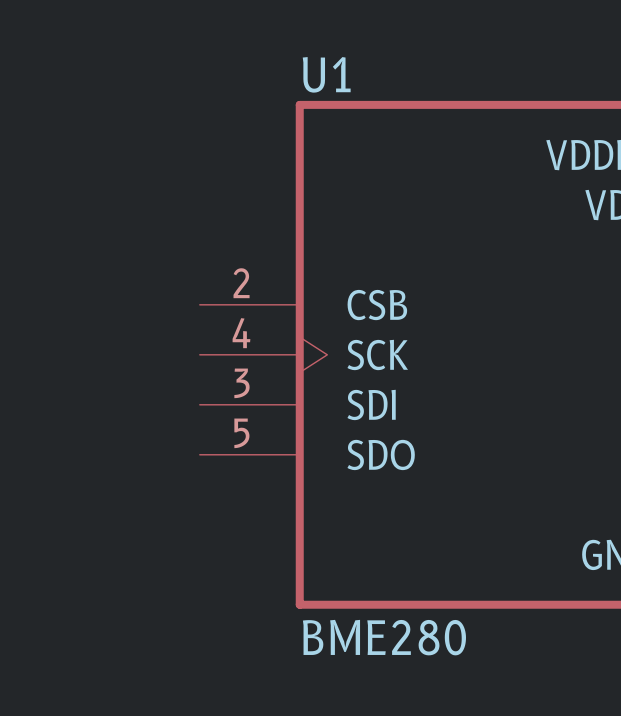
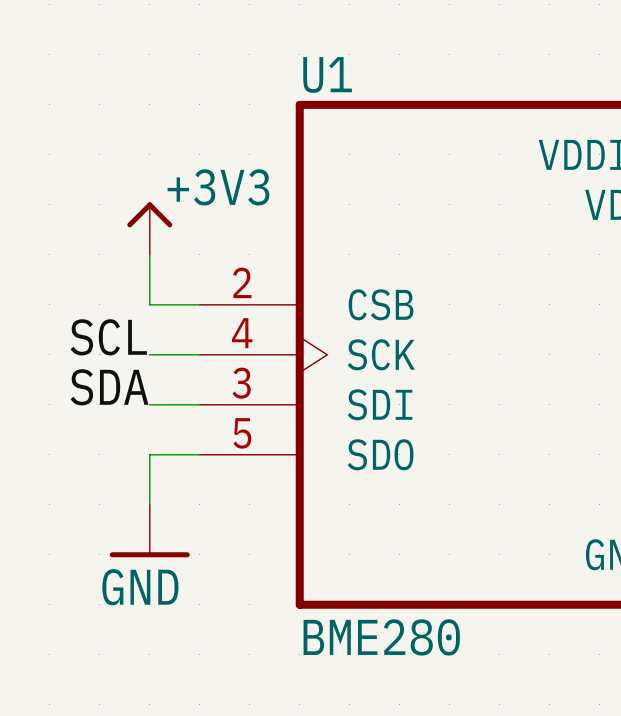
power symbol: none -> +3V3 (149, 228)
wire: none -> (149, 254) (149, 304) (199, 304)
label: none -> SCL (108, 337)
wire: none -> (149, 354) (199, 354)
label: none -> SDA (109, 387)
wire: none -> (149, 404) (199, 404)
wire: none -> (199, 454) (149, 454) (149, 504)
power symbol: none -> GND (149, 531)

